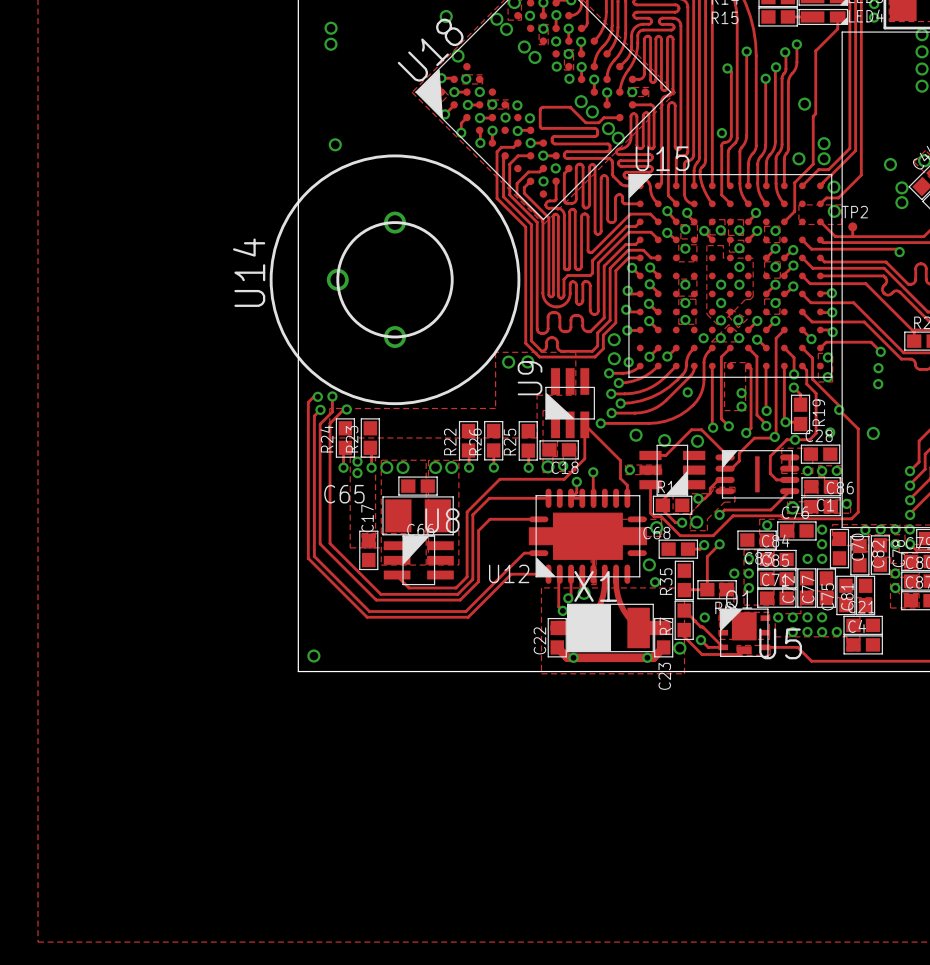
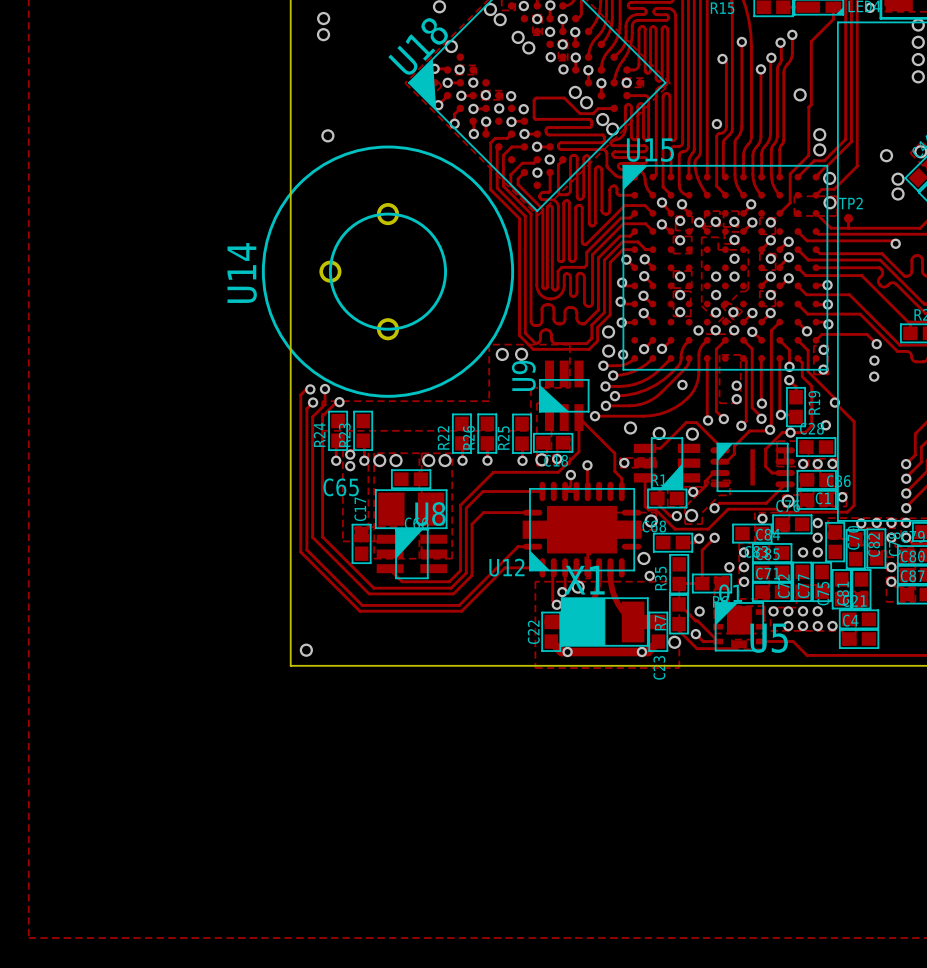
via: (798, 158) -> none
via: (873, 433) -> none

